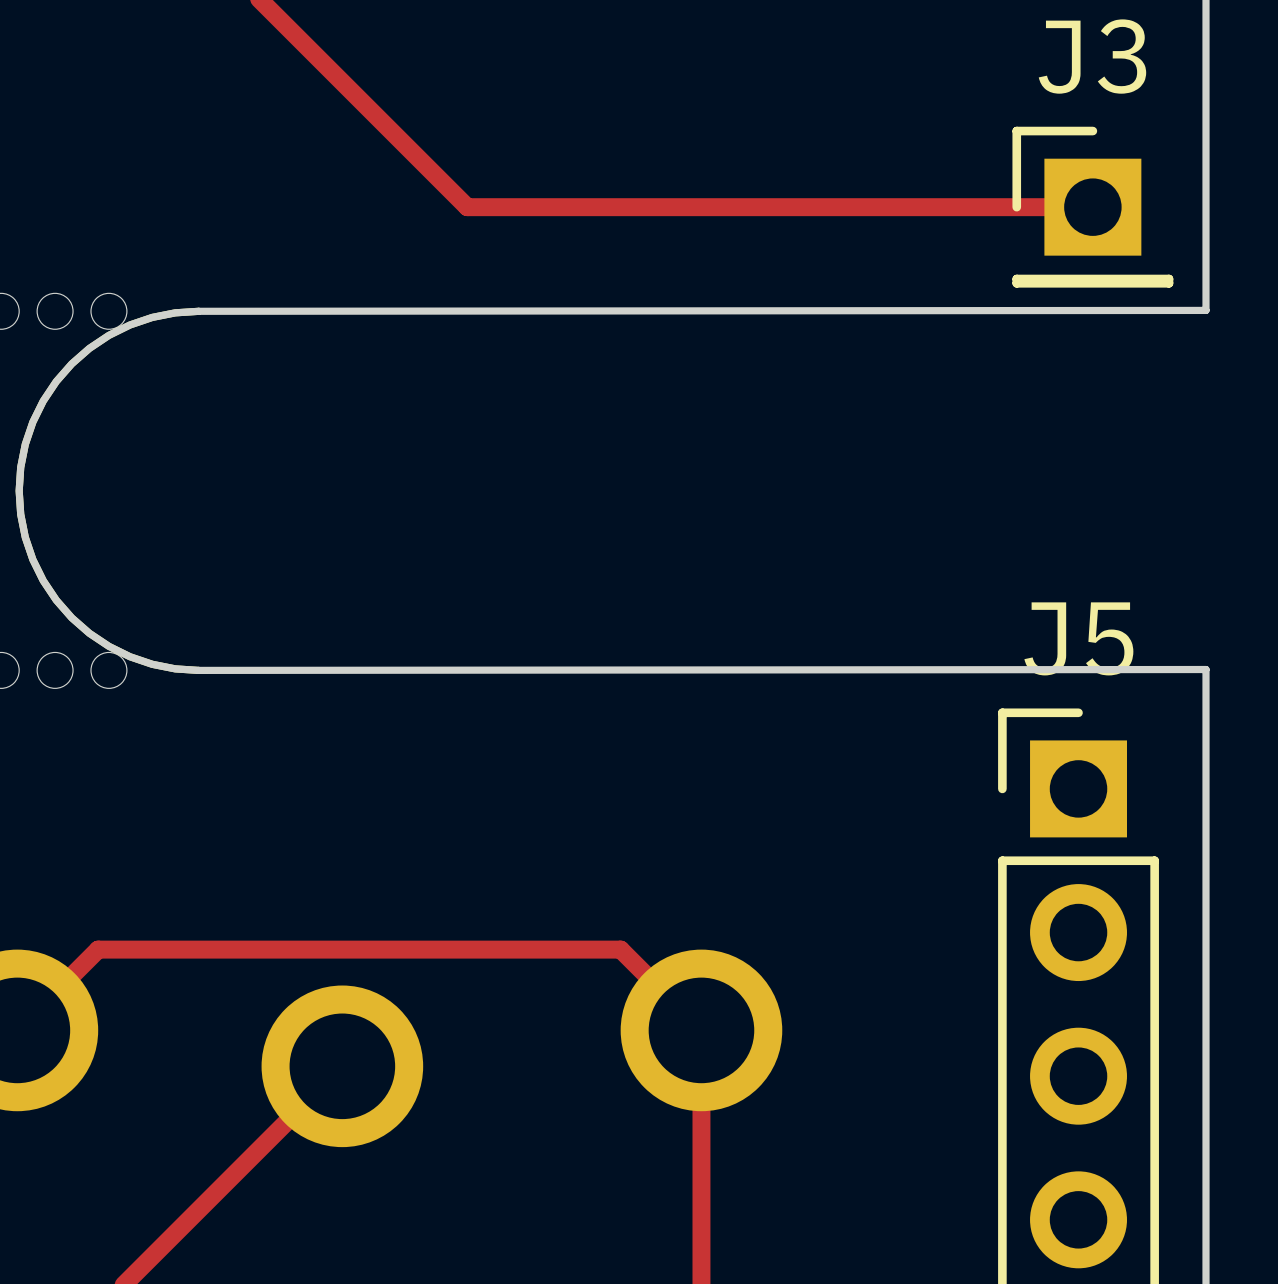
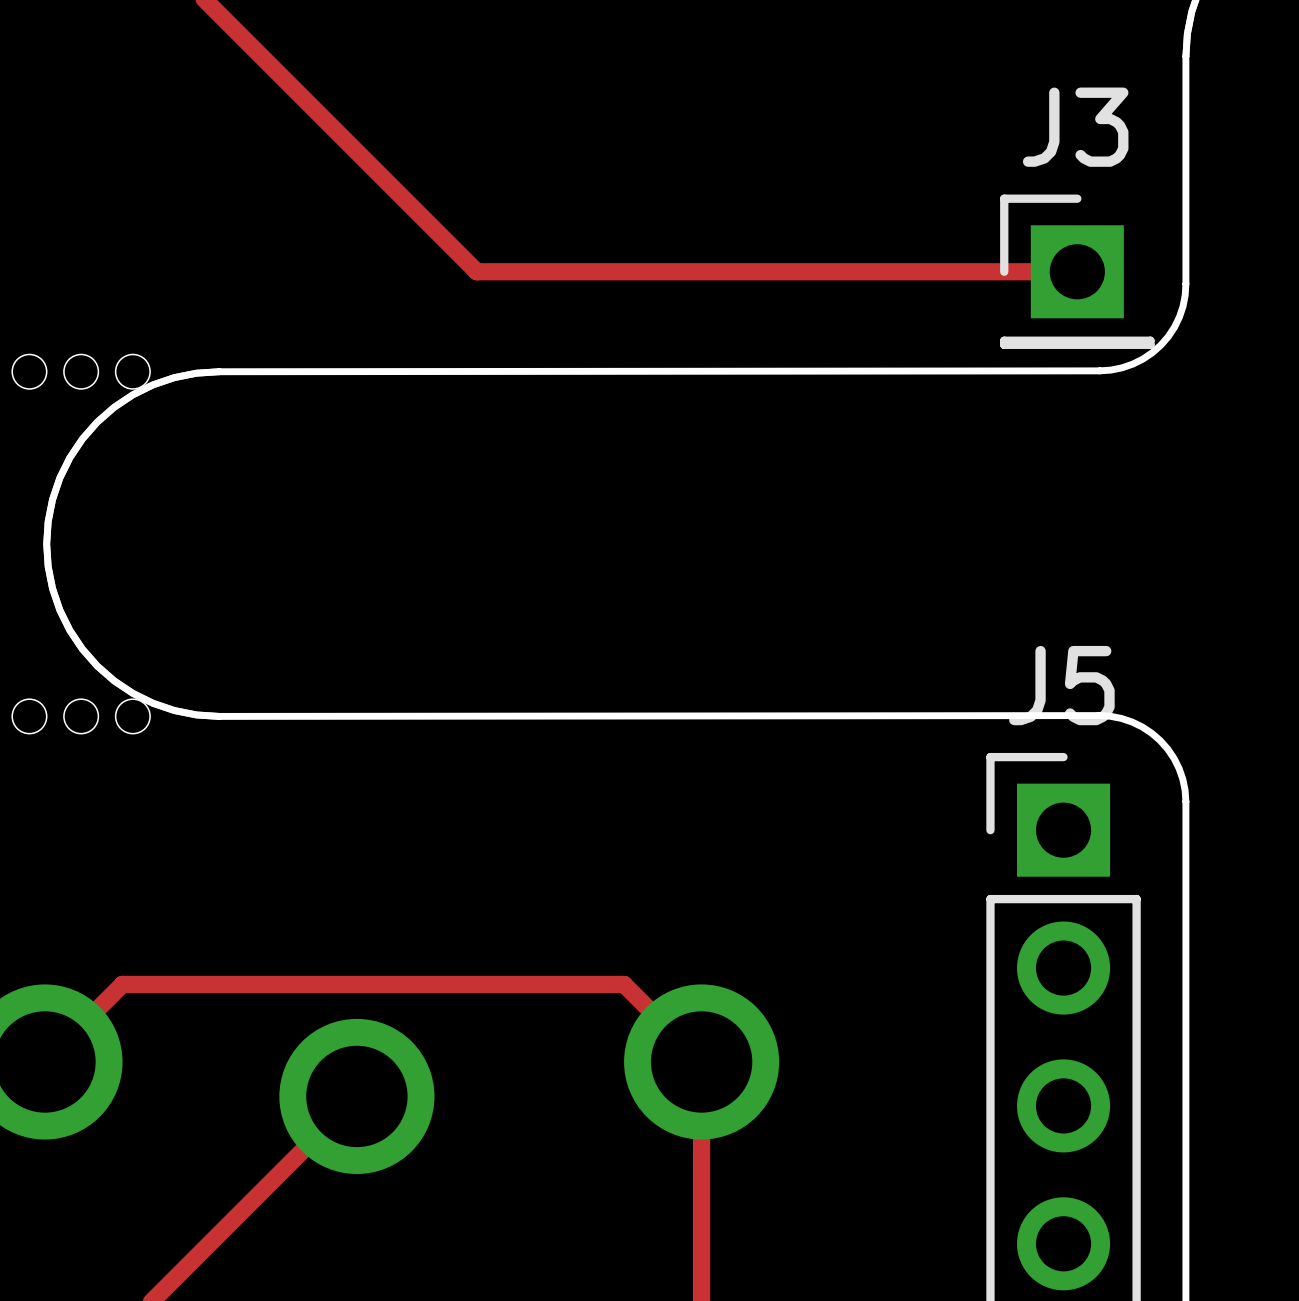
board edge: (1205, 219) (1205, 310) (198, 311) -> (1185, 283) (1179, 317) (1160, 345) (1132, 364) (1111, 370) (219, 371)
board edge: (198, 670) (1205, 669) (1205, 759) -> (219, 716) (1110, 716) (1132, 721) (1160, 740) (1179, 768) (1185, 801)

